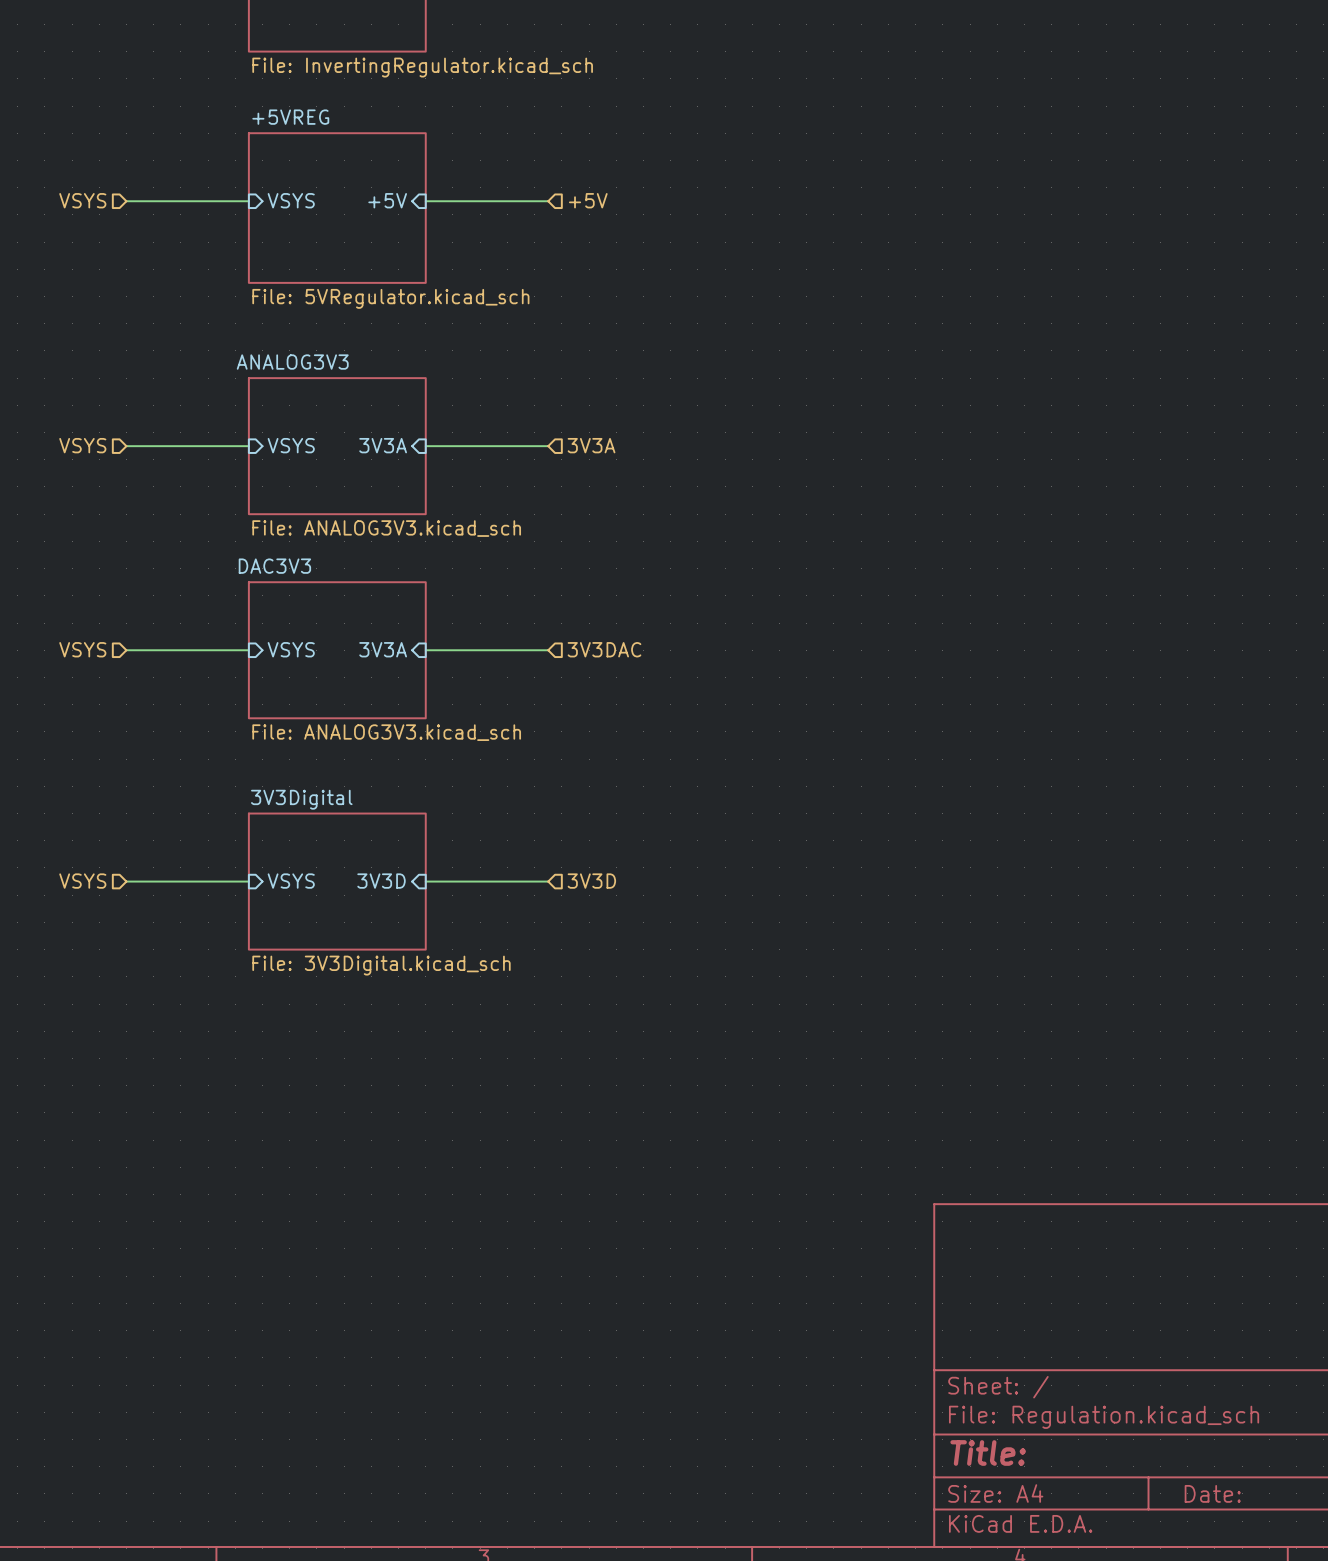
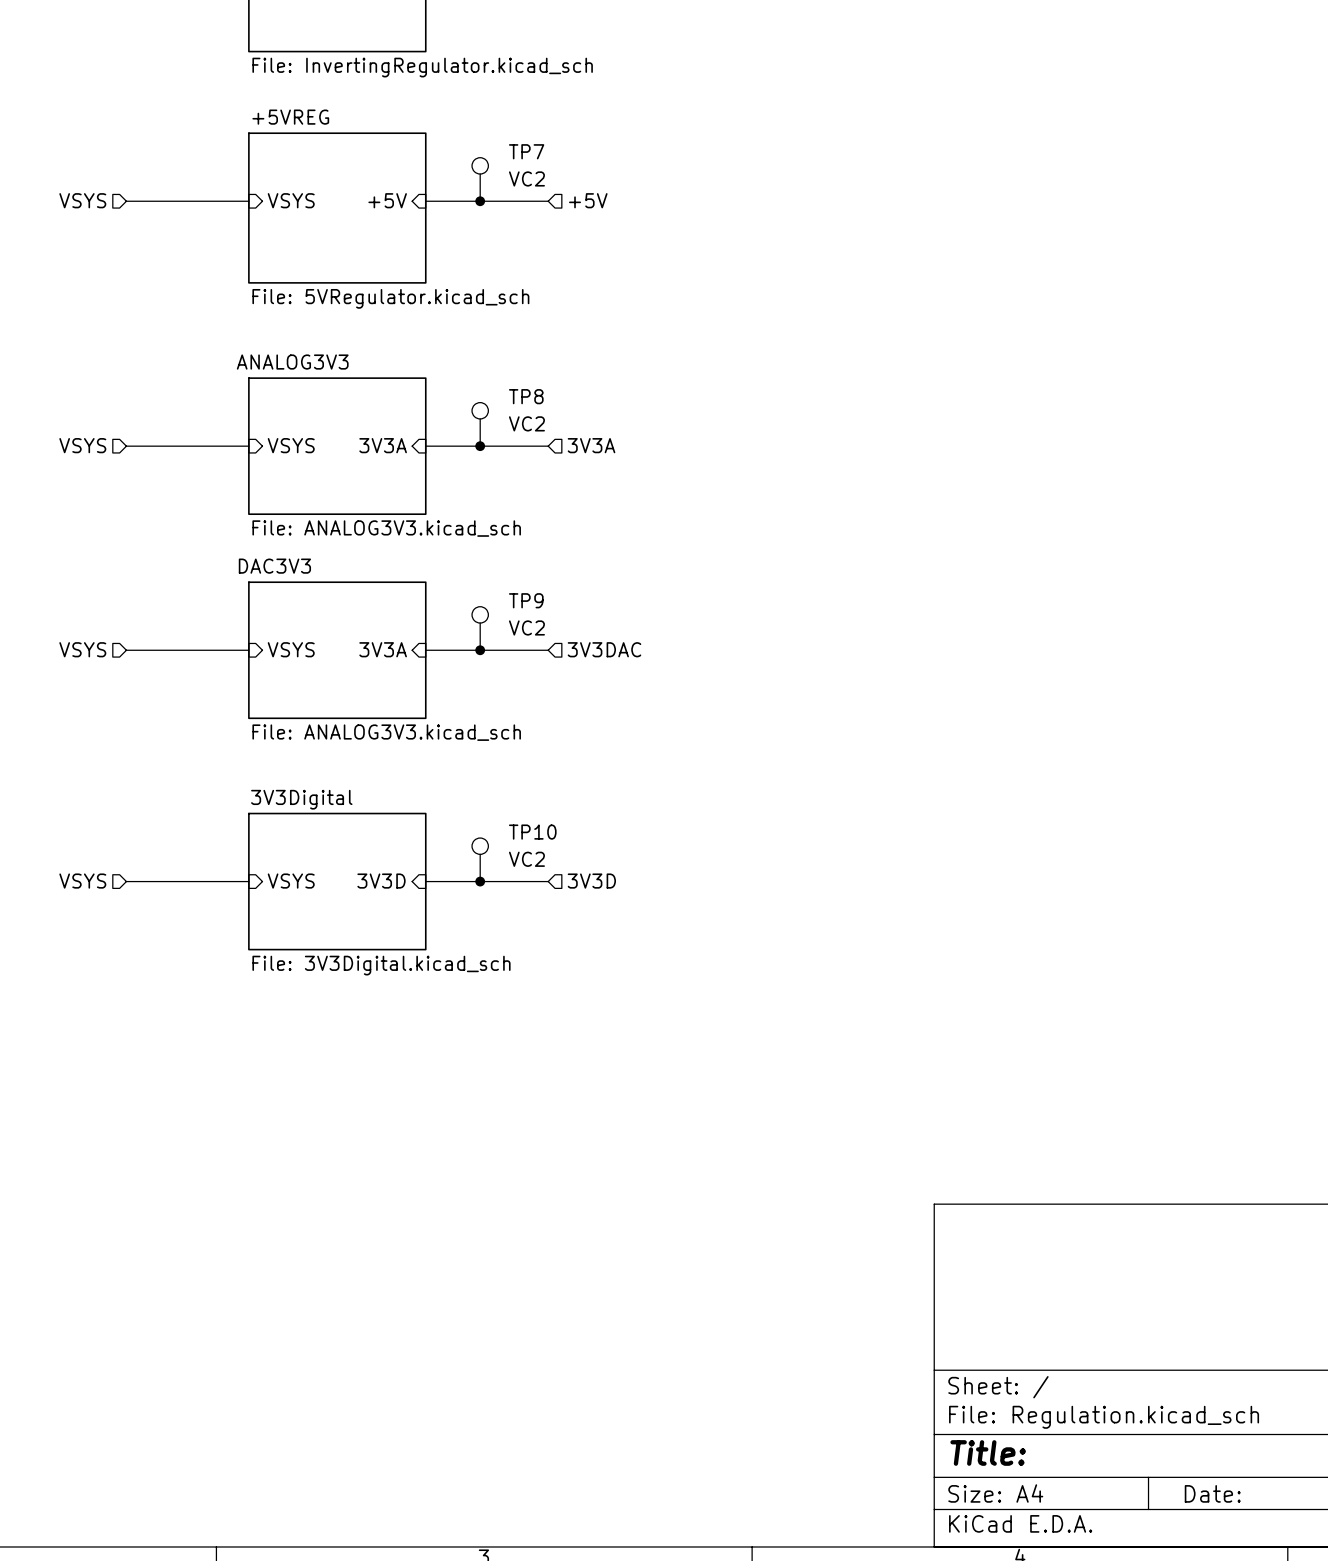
TP7: none -> VC2 (480, 179)
junction: none -> (480, 201)
TP8: none -> VC2 (480, 424)
junction: none -> (480, 446)
TP9: none -> VC2 (480, 628)
junction: none -> (480, 650)
TP10: none -> VC2 (480, 859)
junction: none -> (480, 881)

